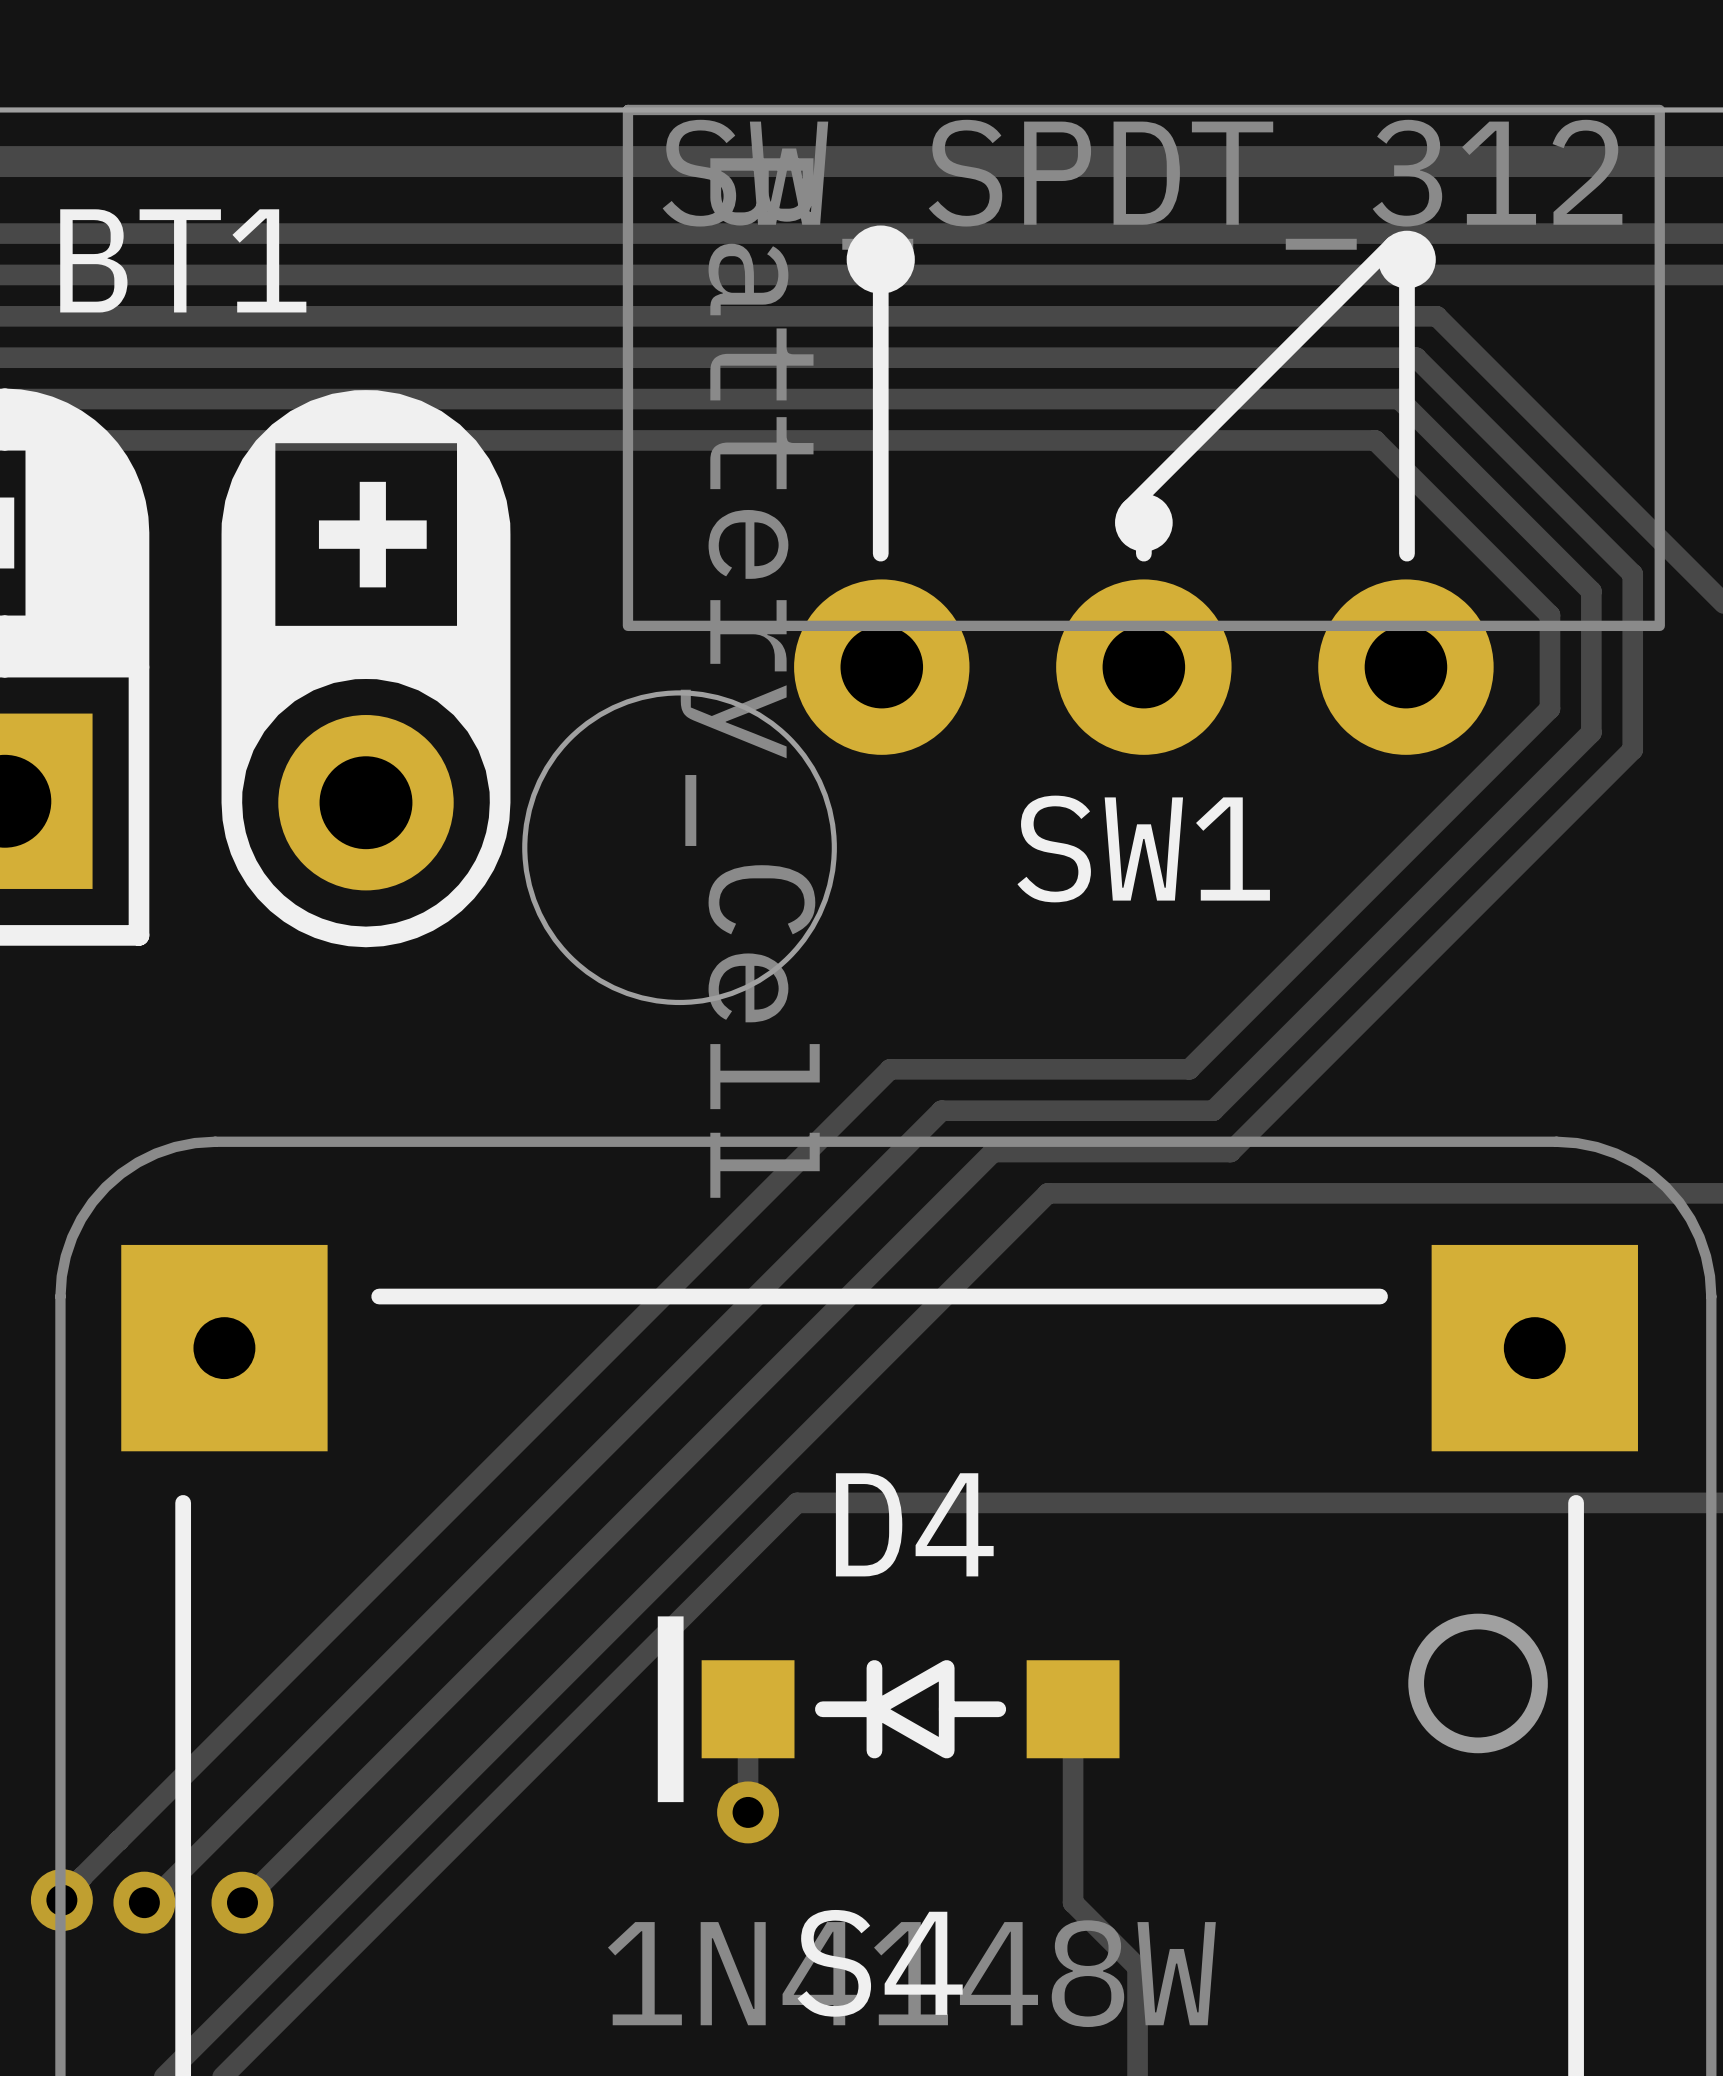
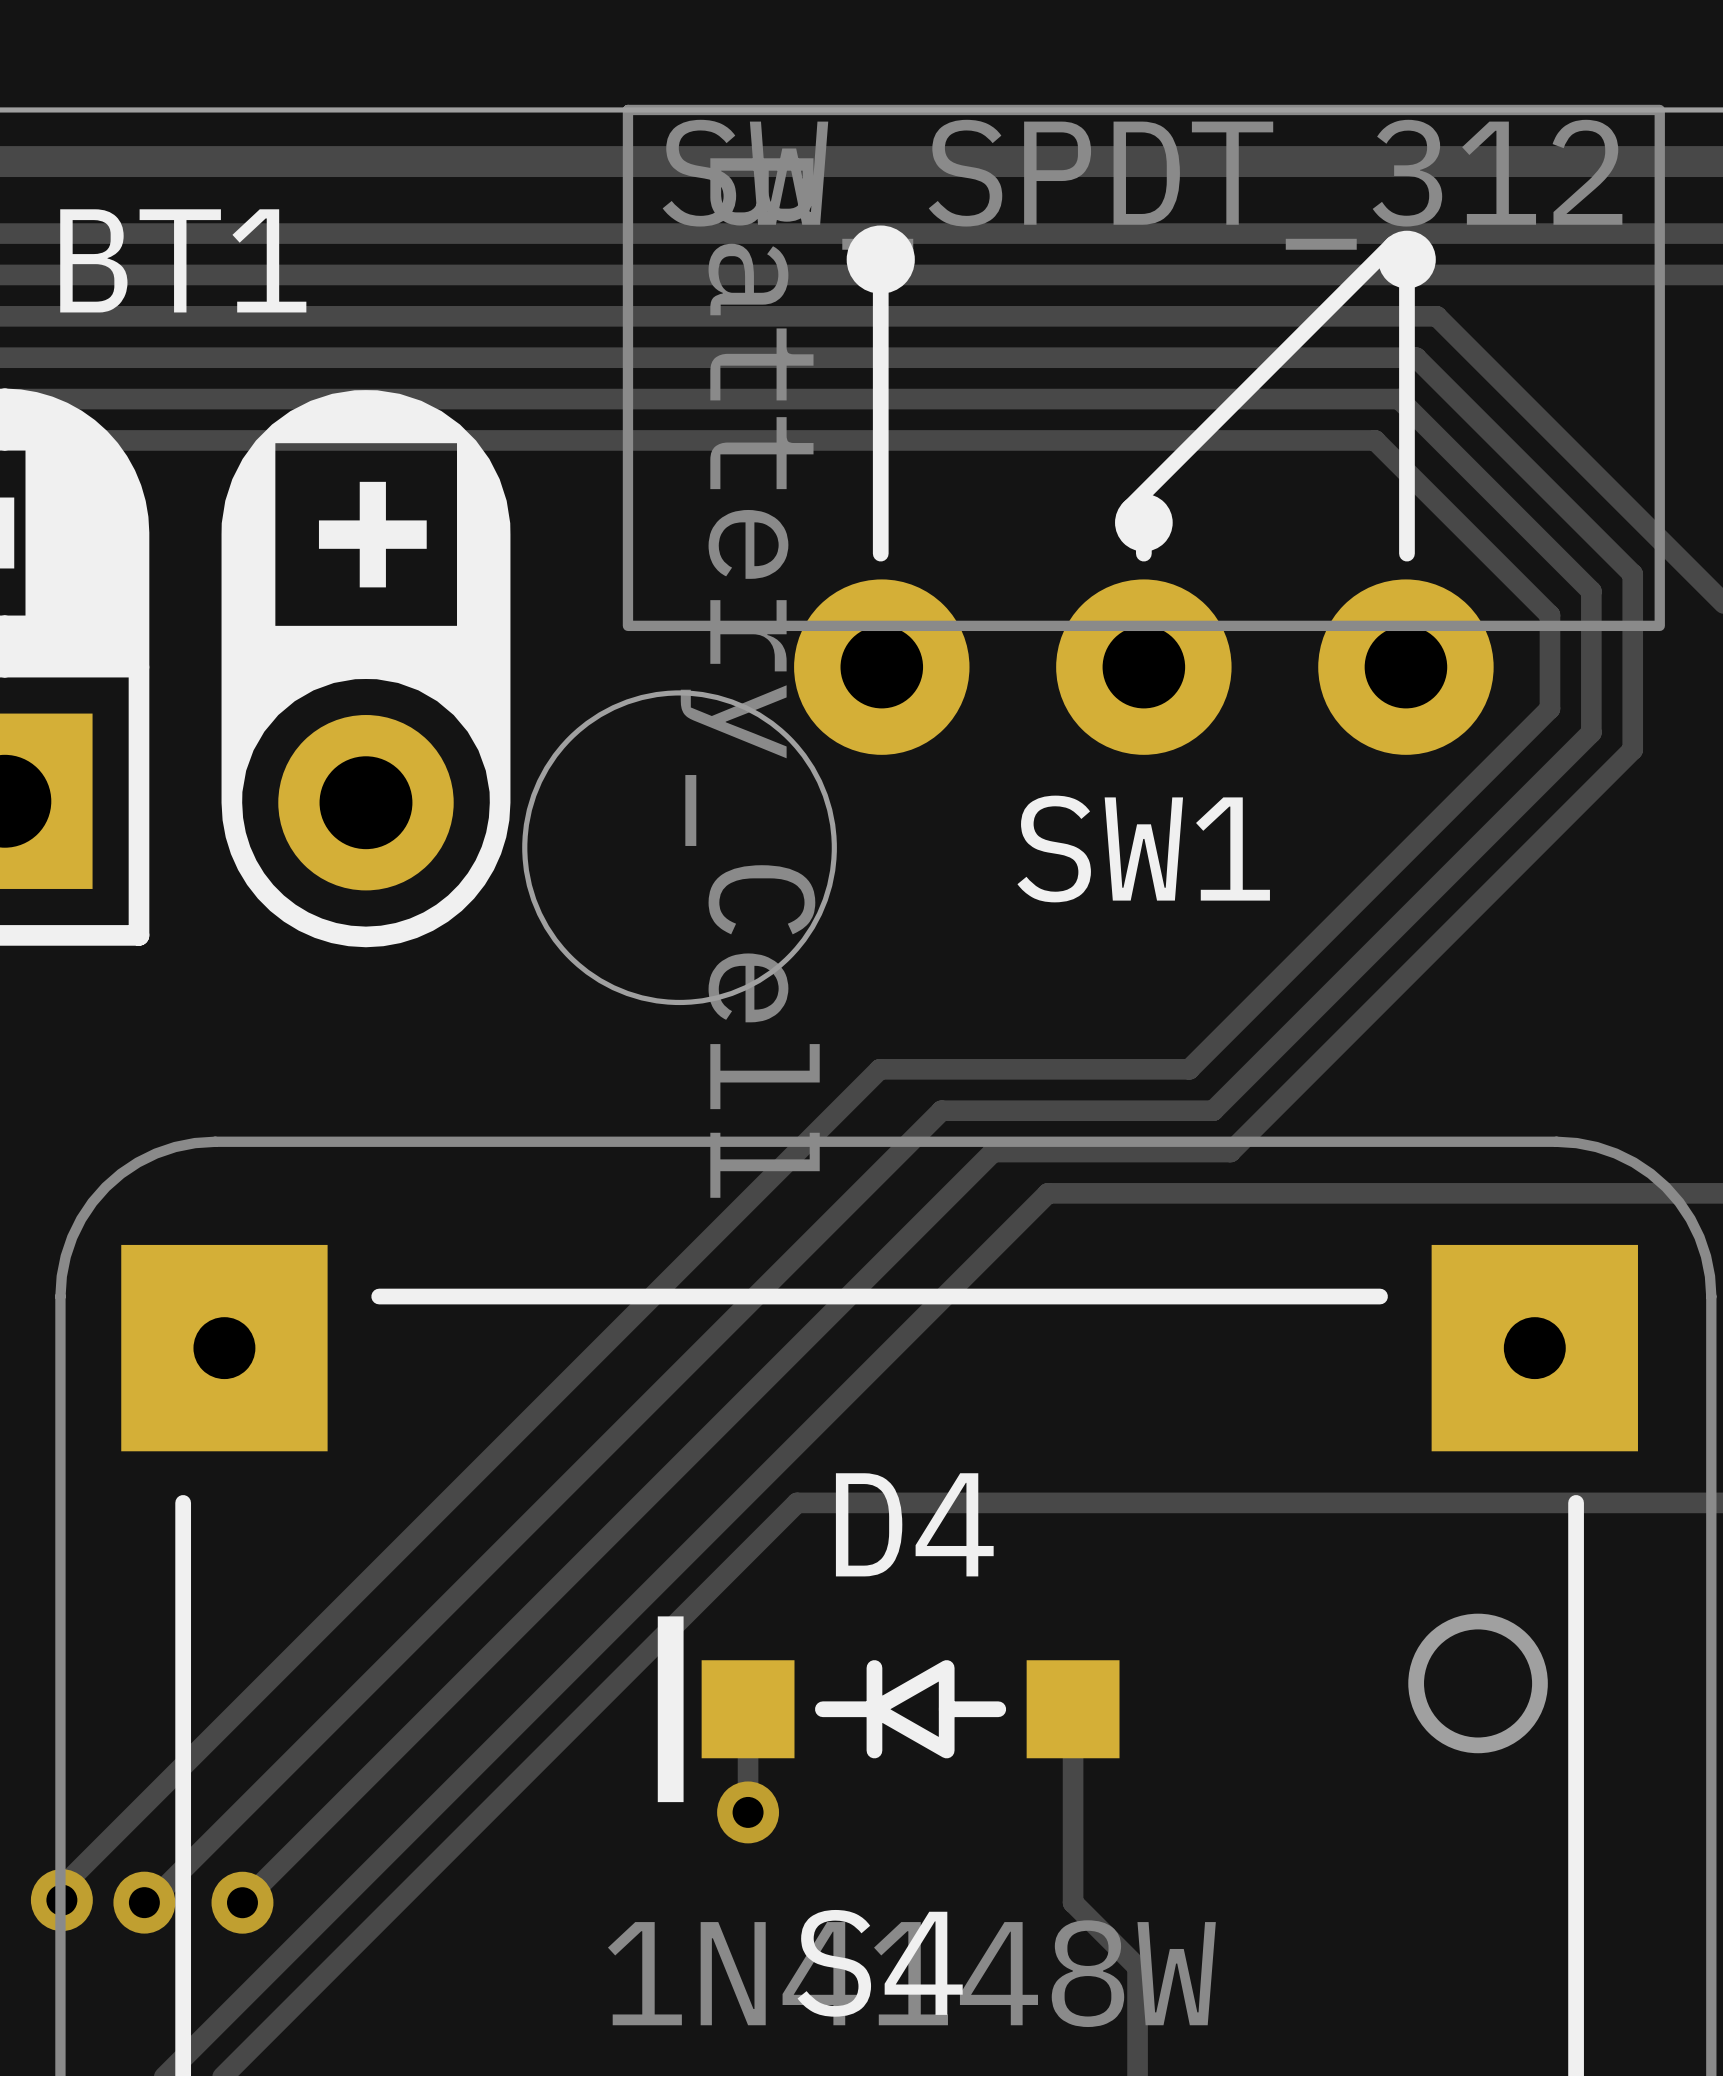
track: (890, 1069) (61, 1897) (61, 1900) -> (890, 1069) (879, 1069) (49, 1900)

